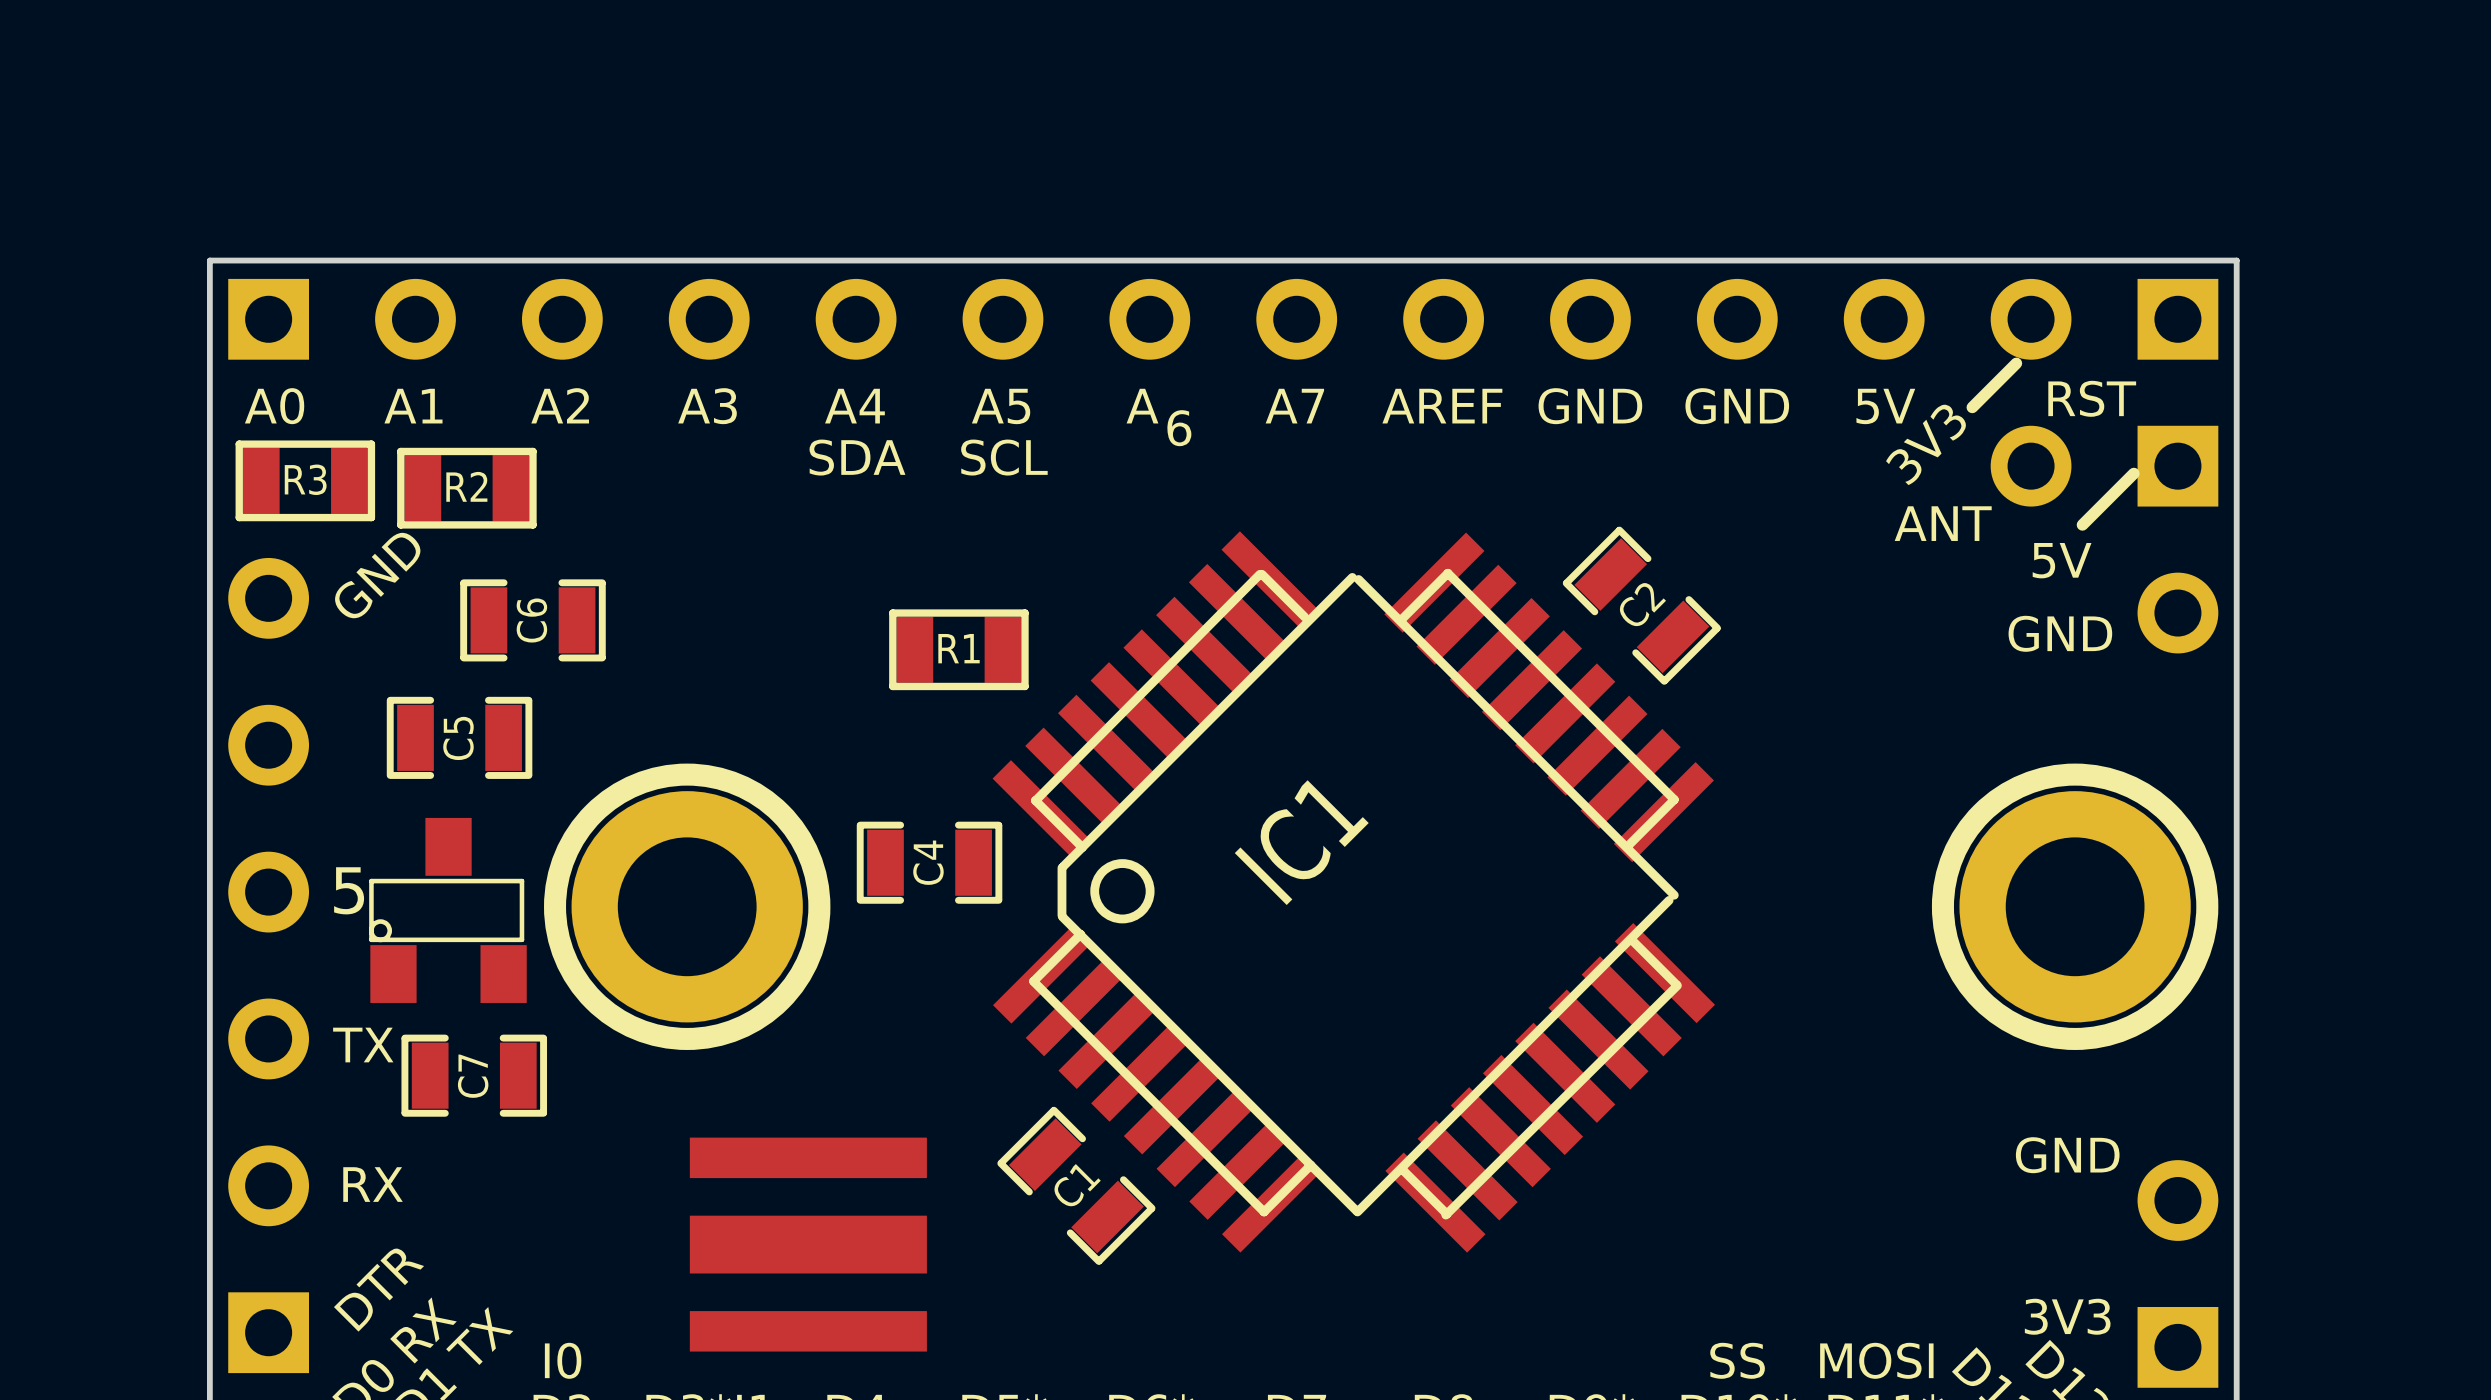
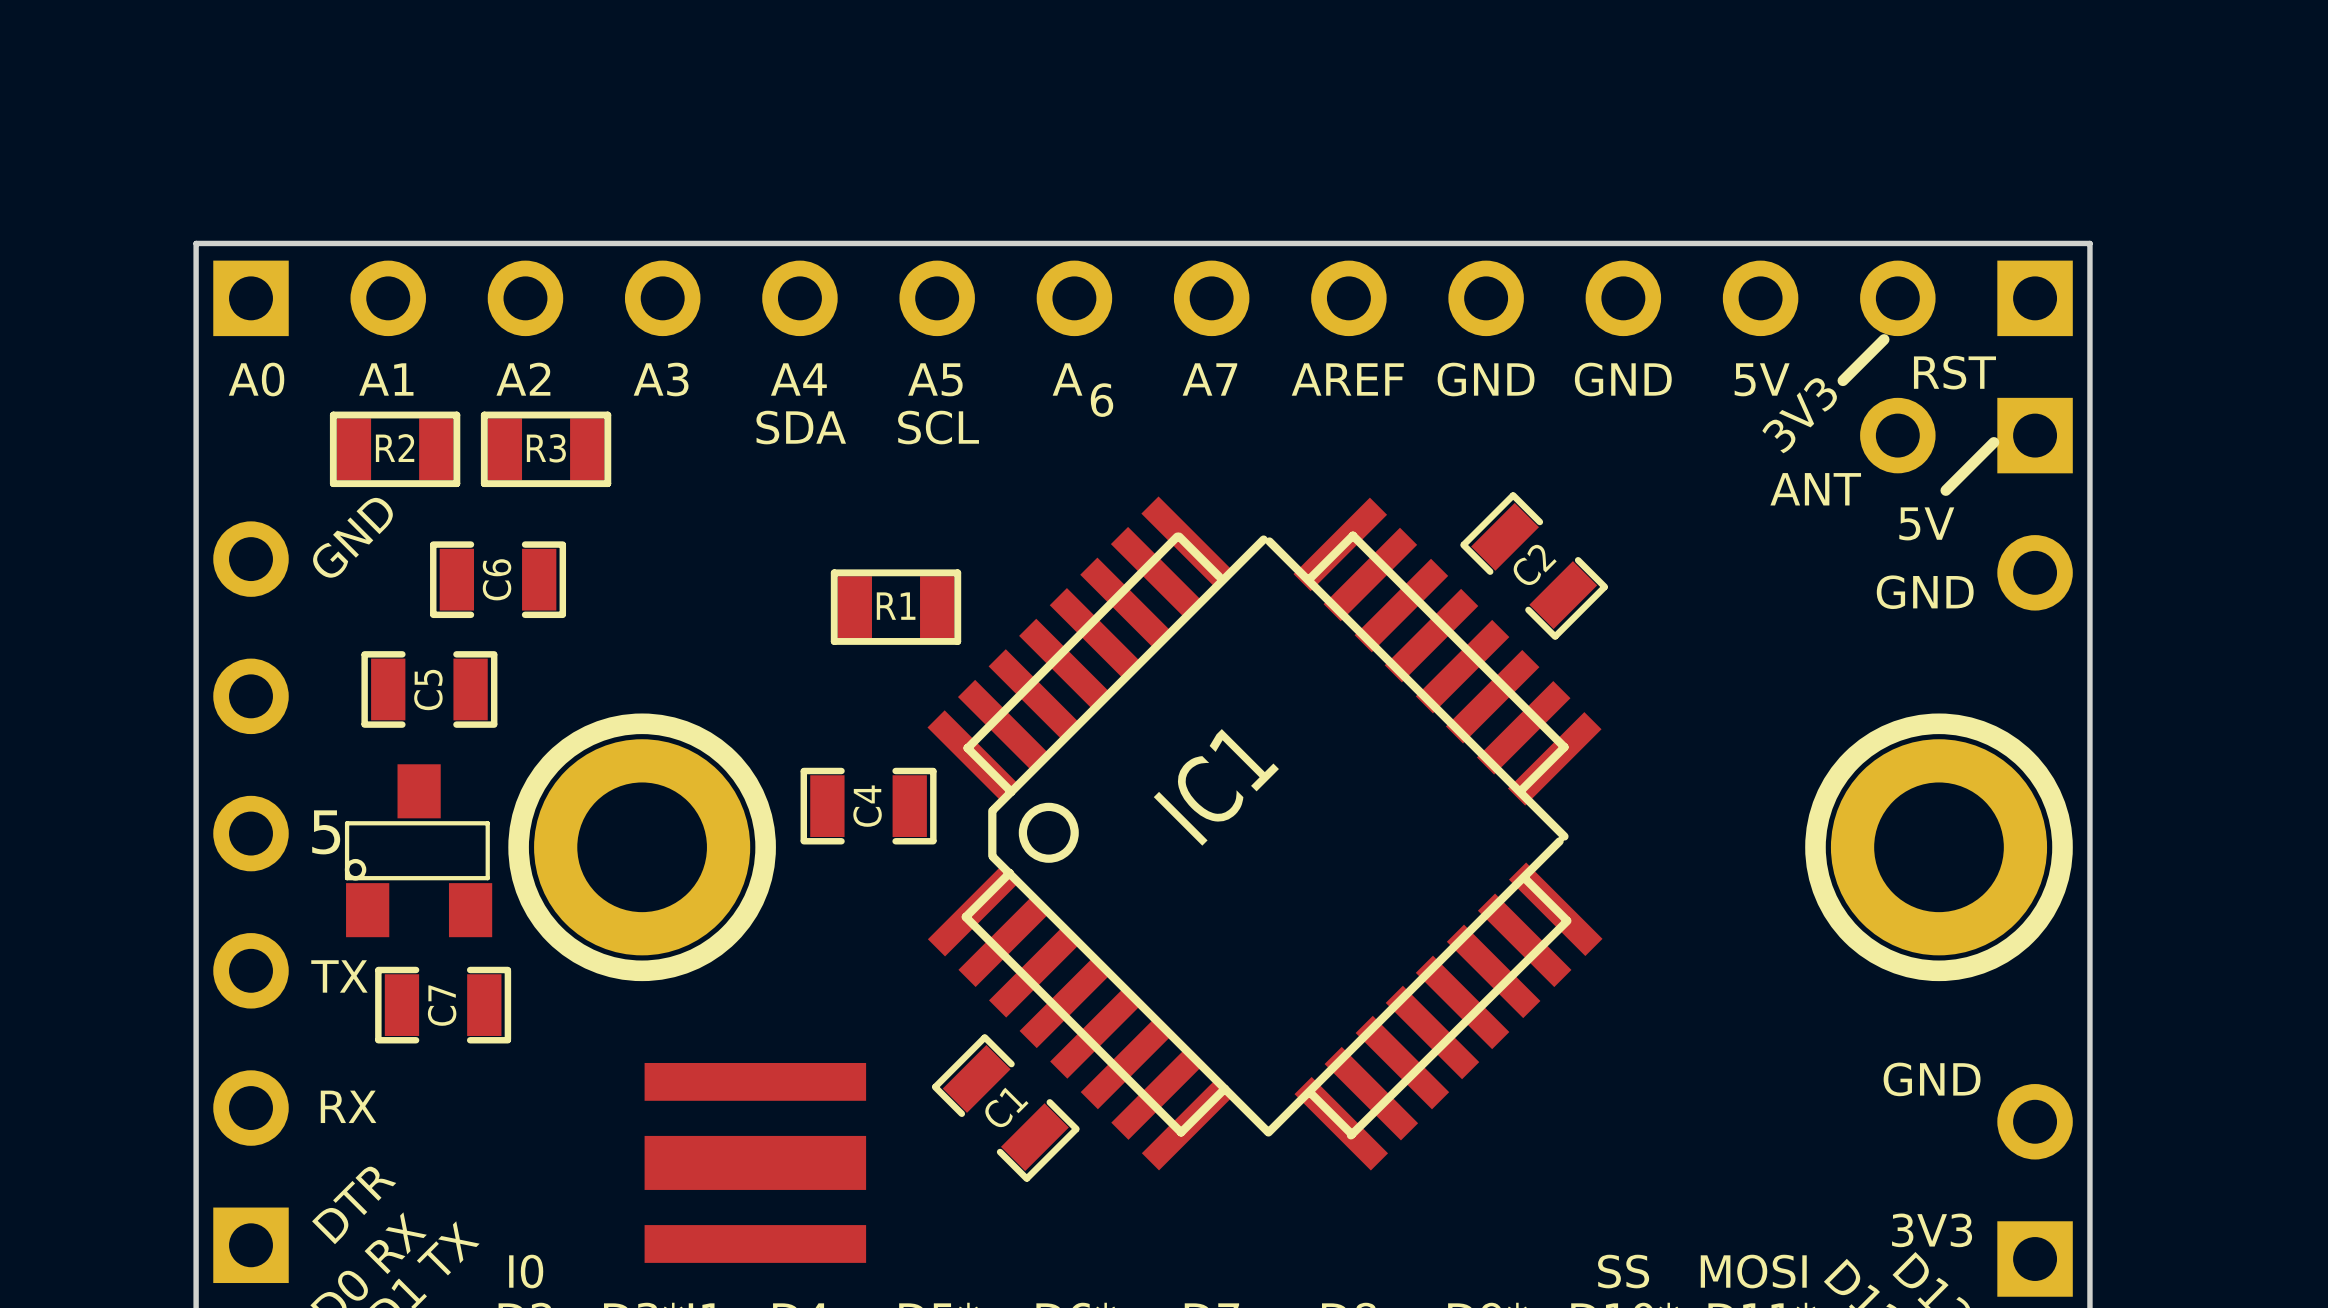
R3 position: (305, 480) -> (546, 449)
R2 position: (466, 488) -> (395, 449)

